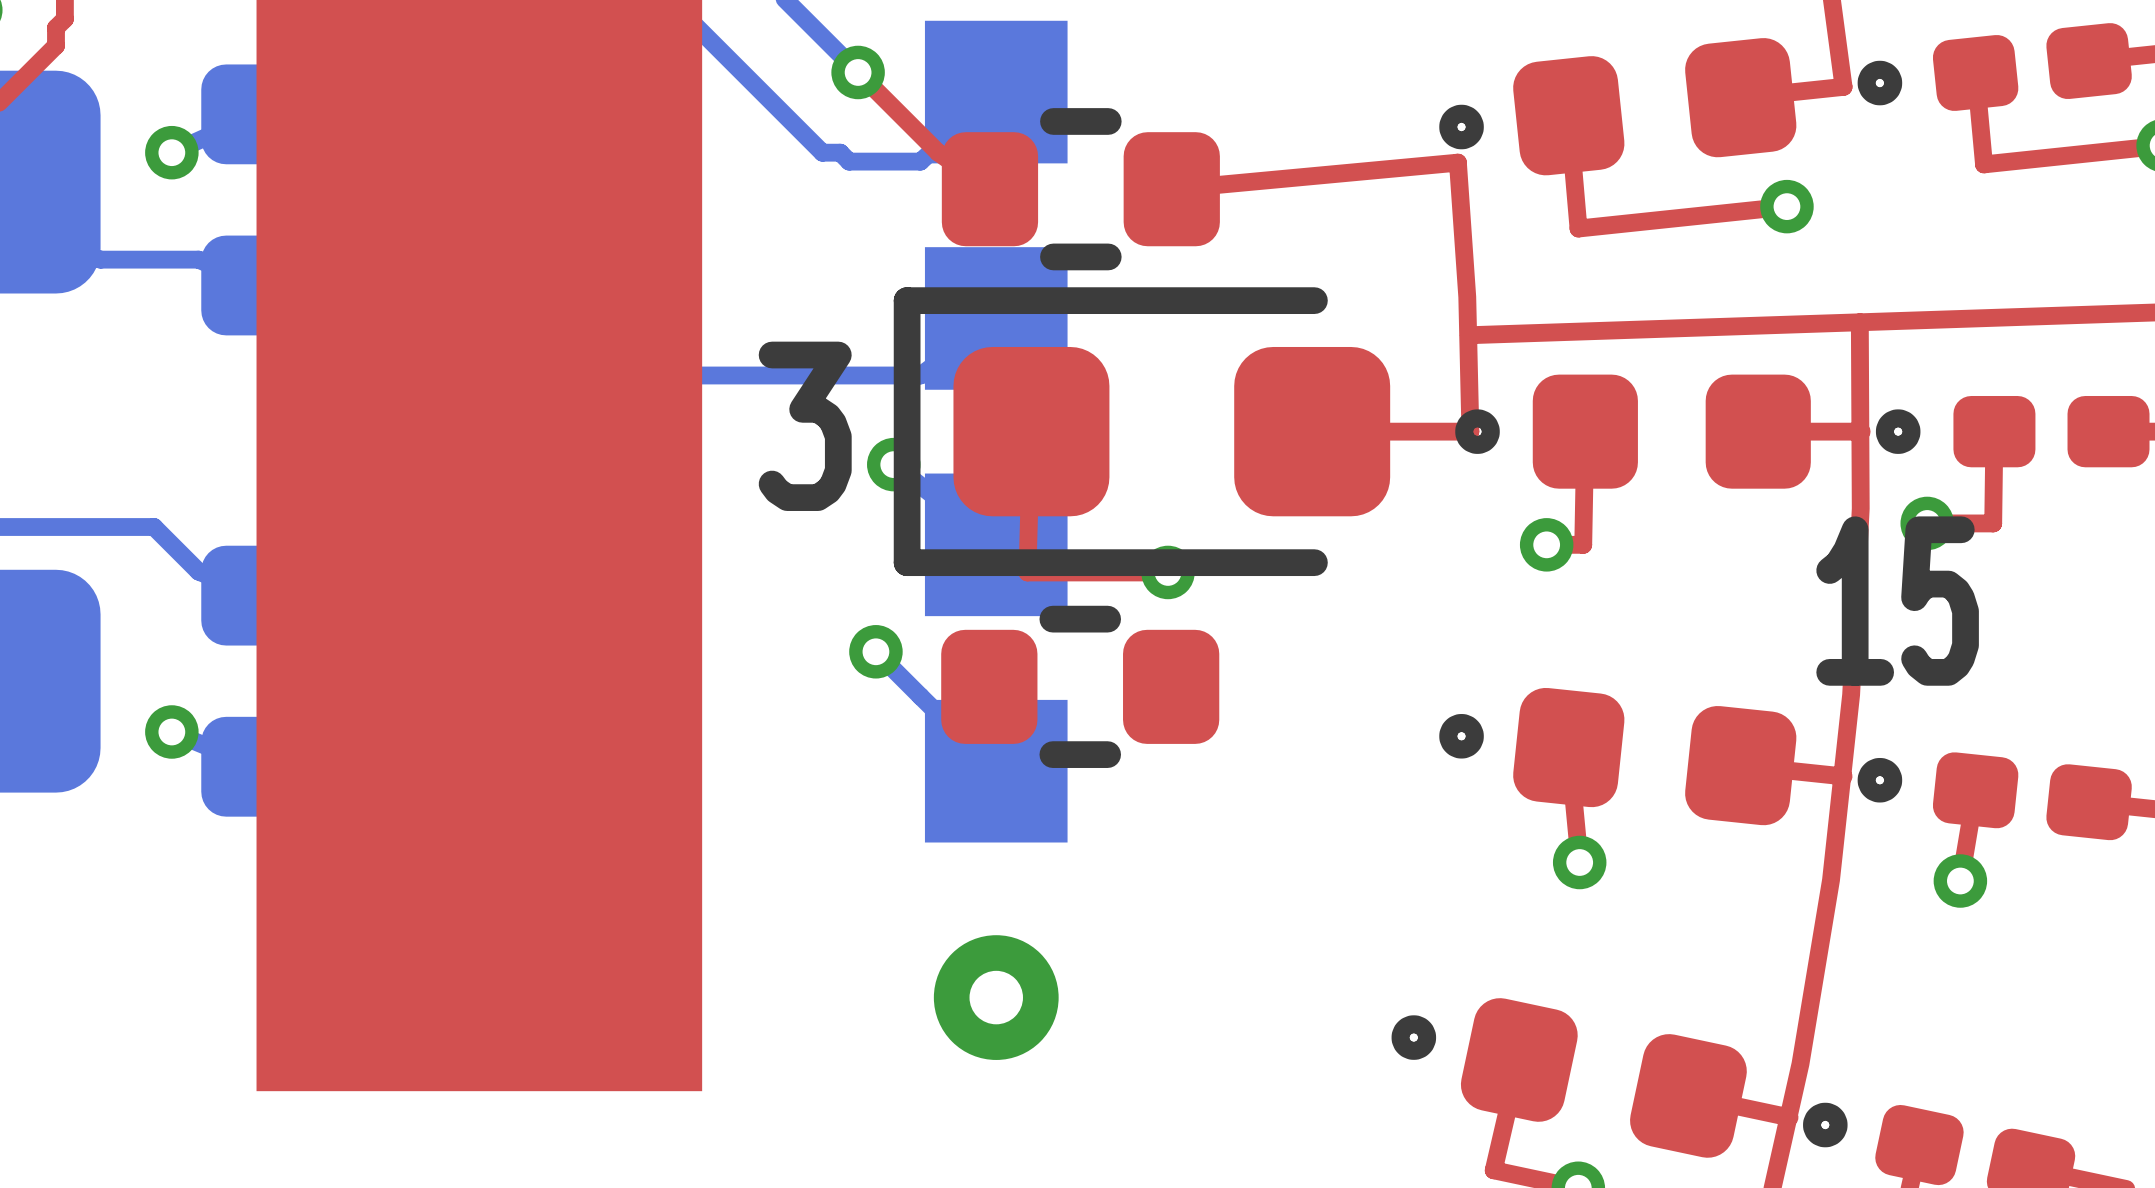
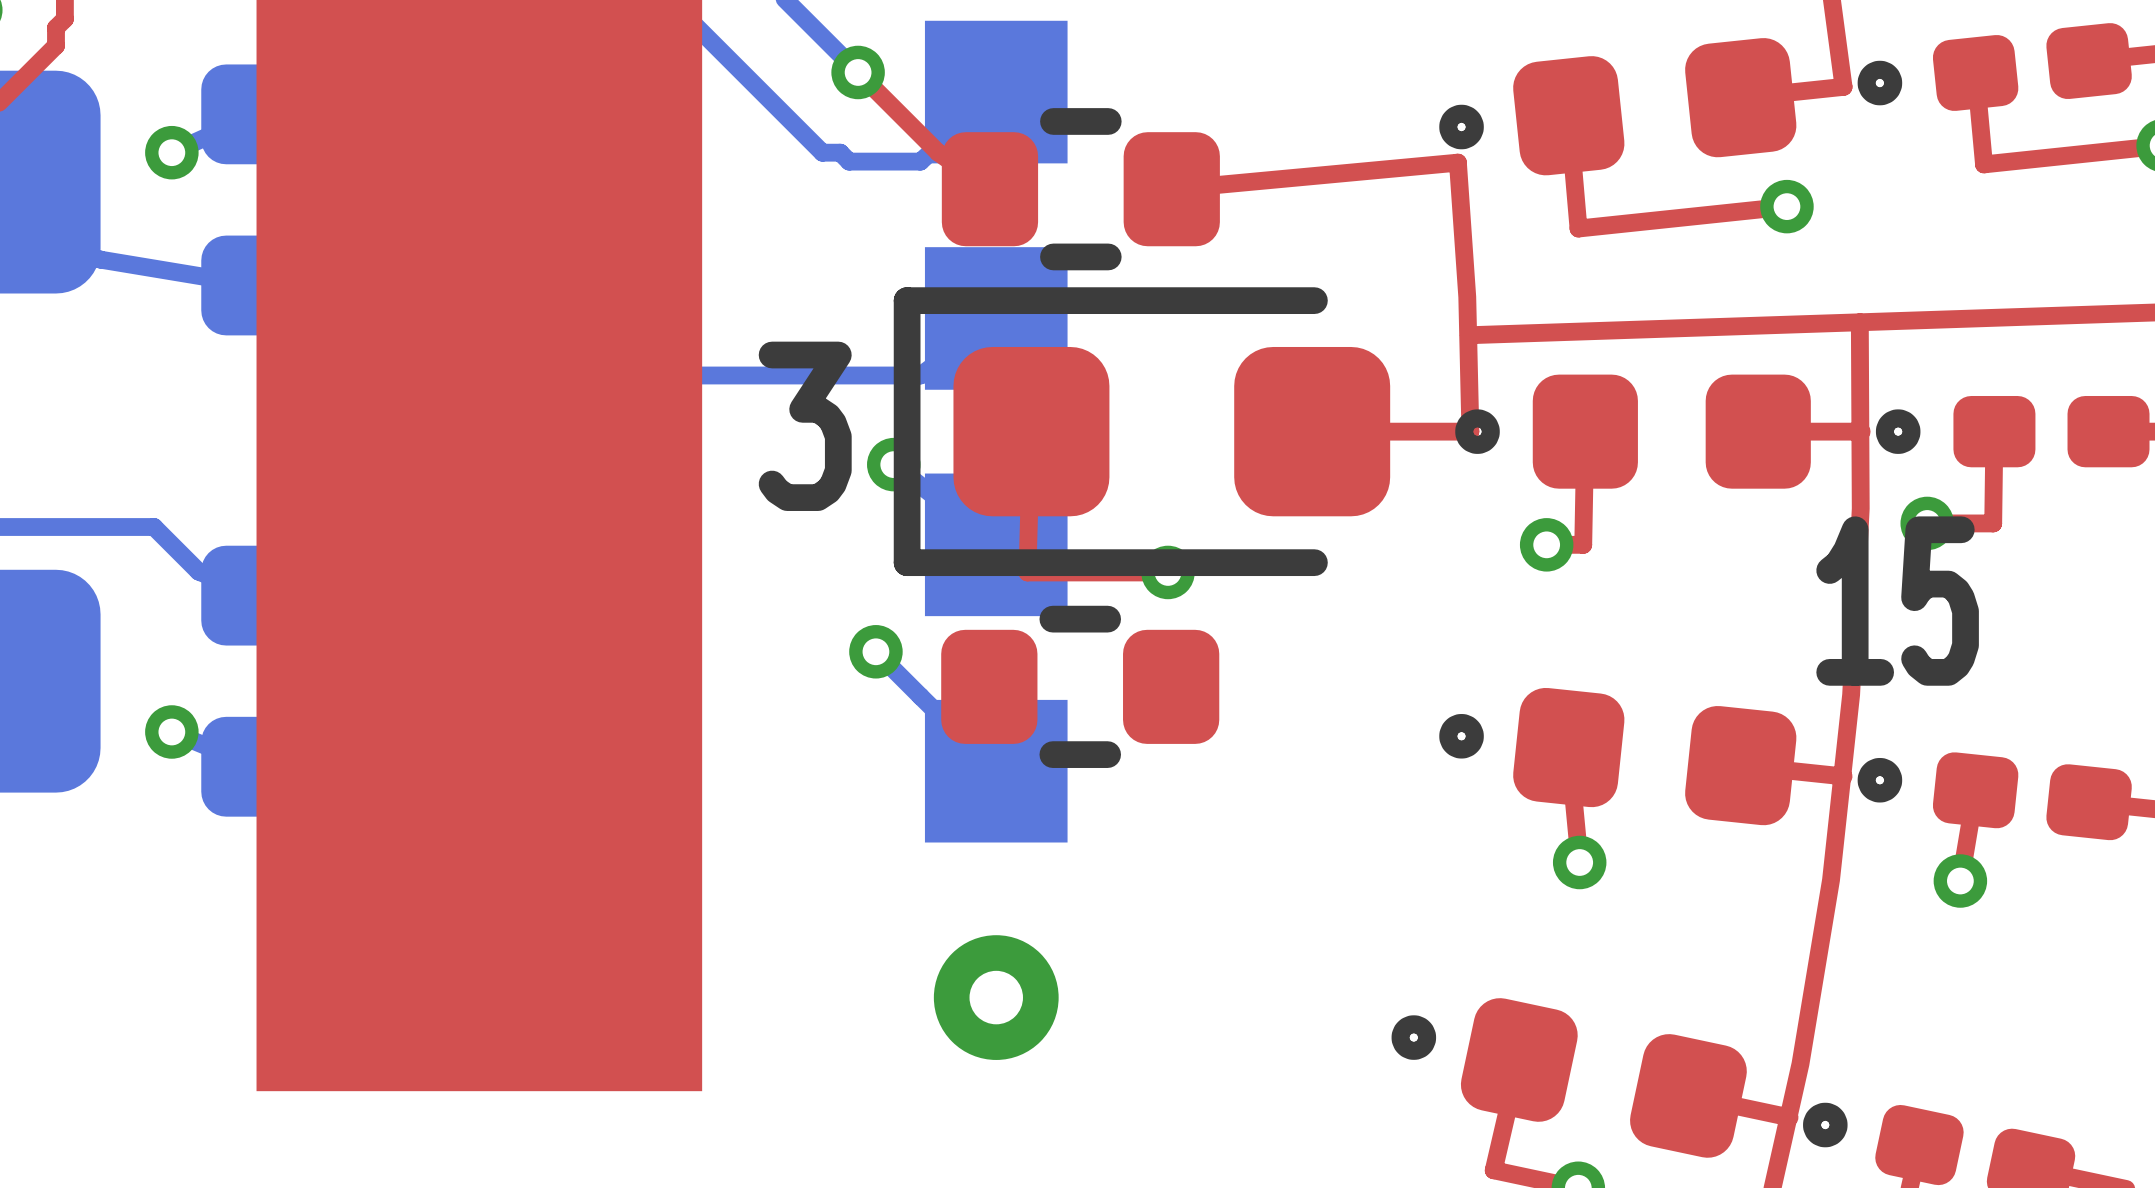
bottom track: (100, 259) (198, 259) (256, 285) -> (100, 259) (256, 285)

